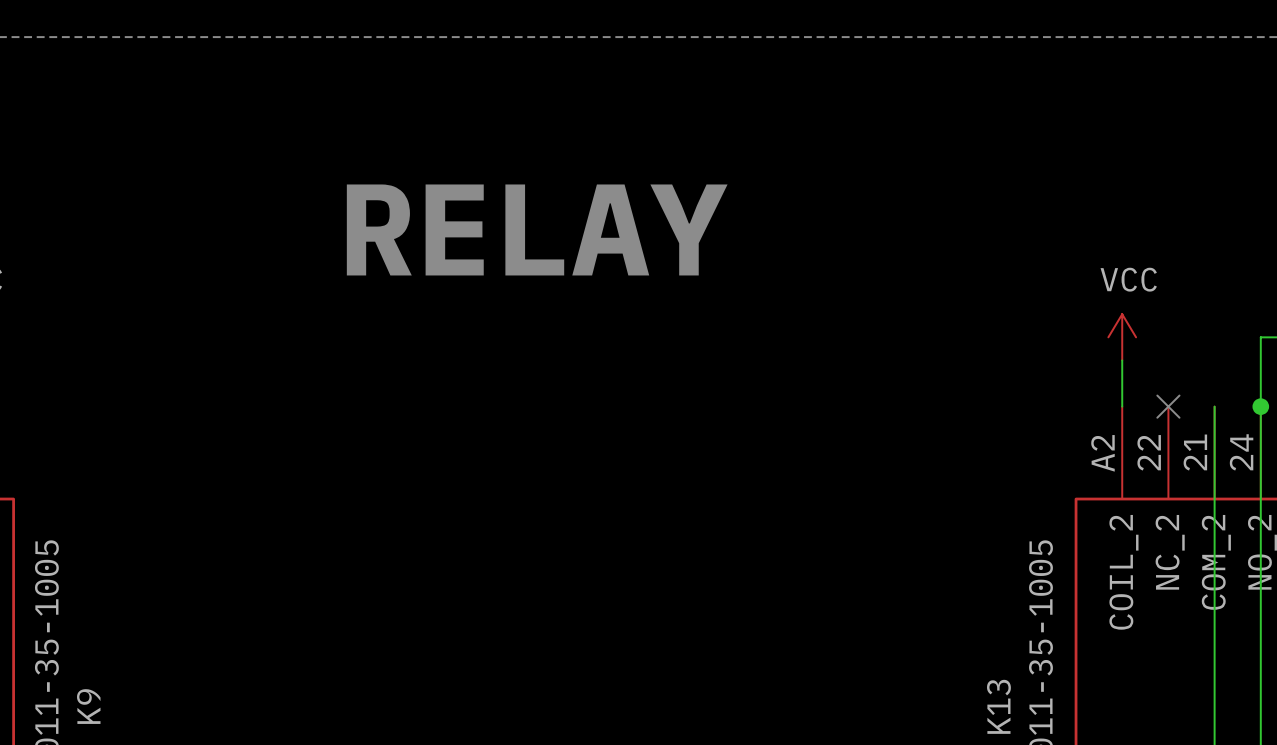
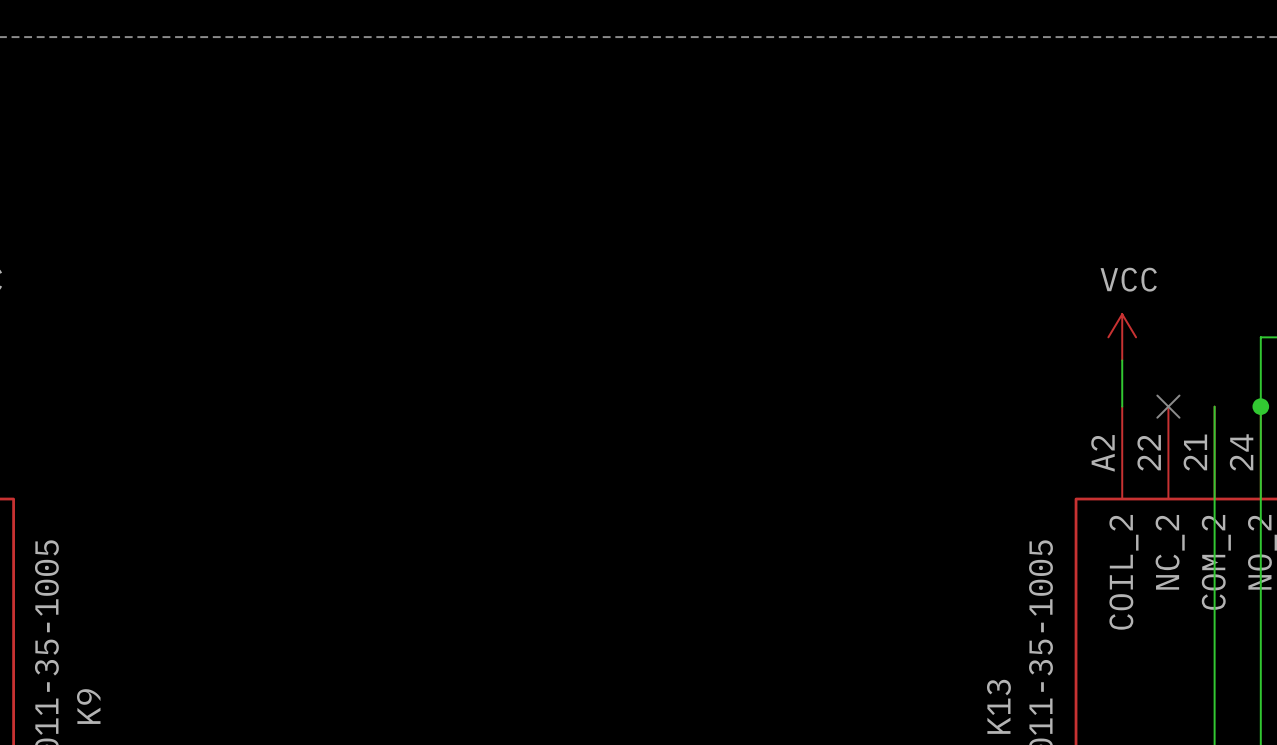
text: RELAY (537, 229) -> none

